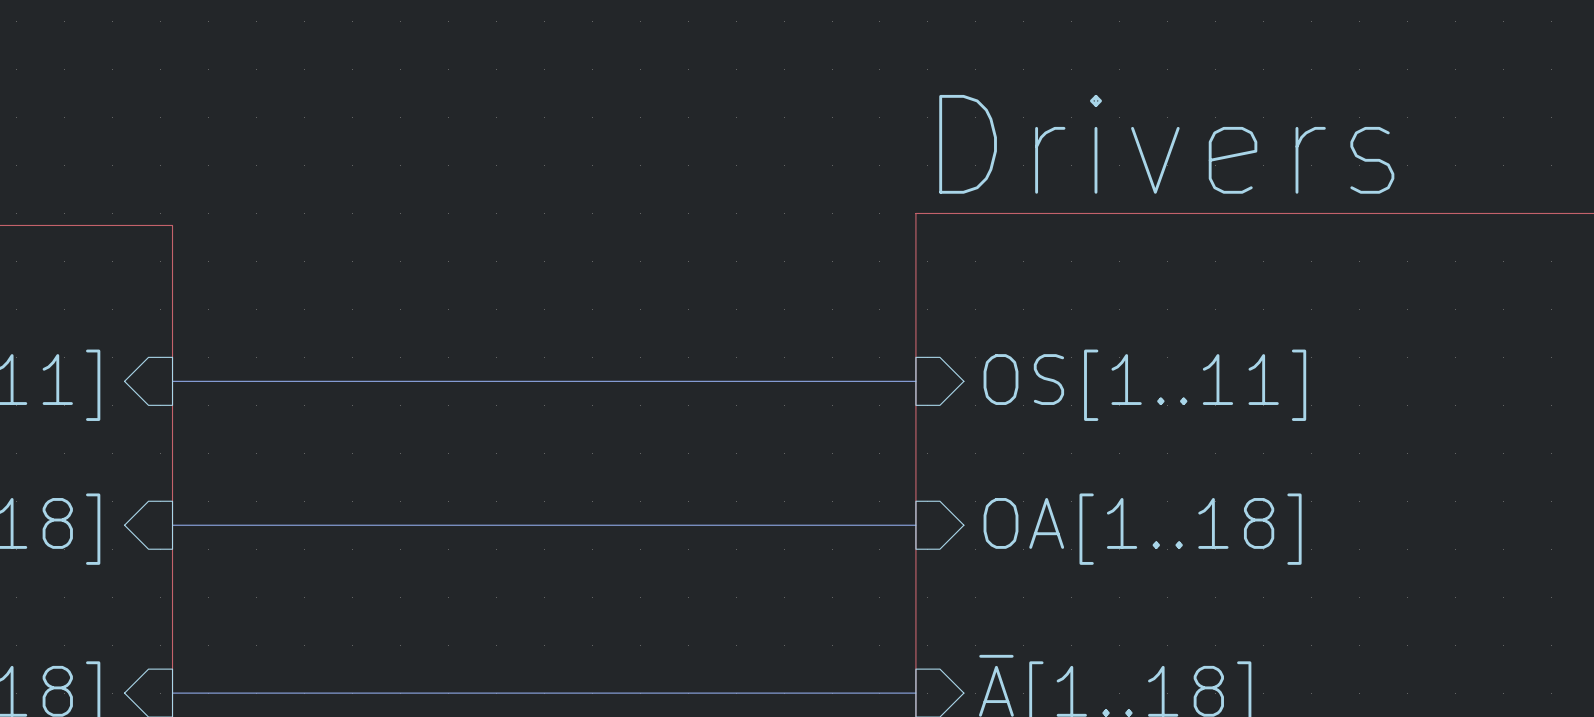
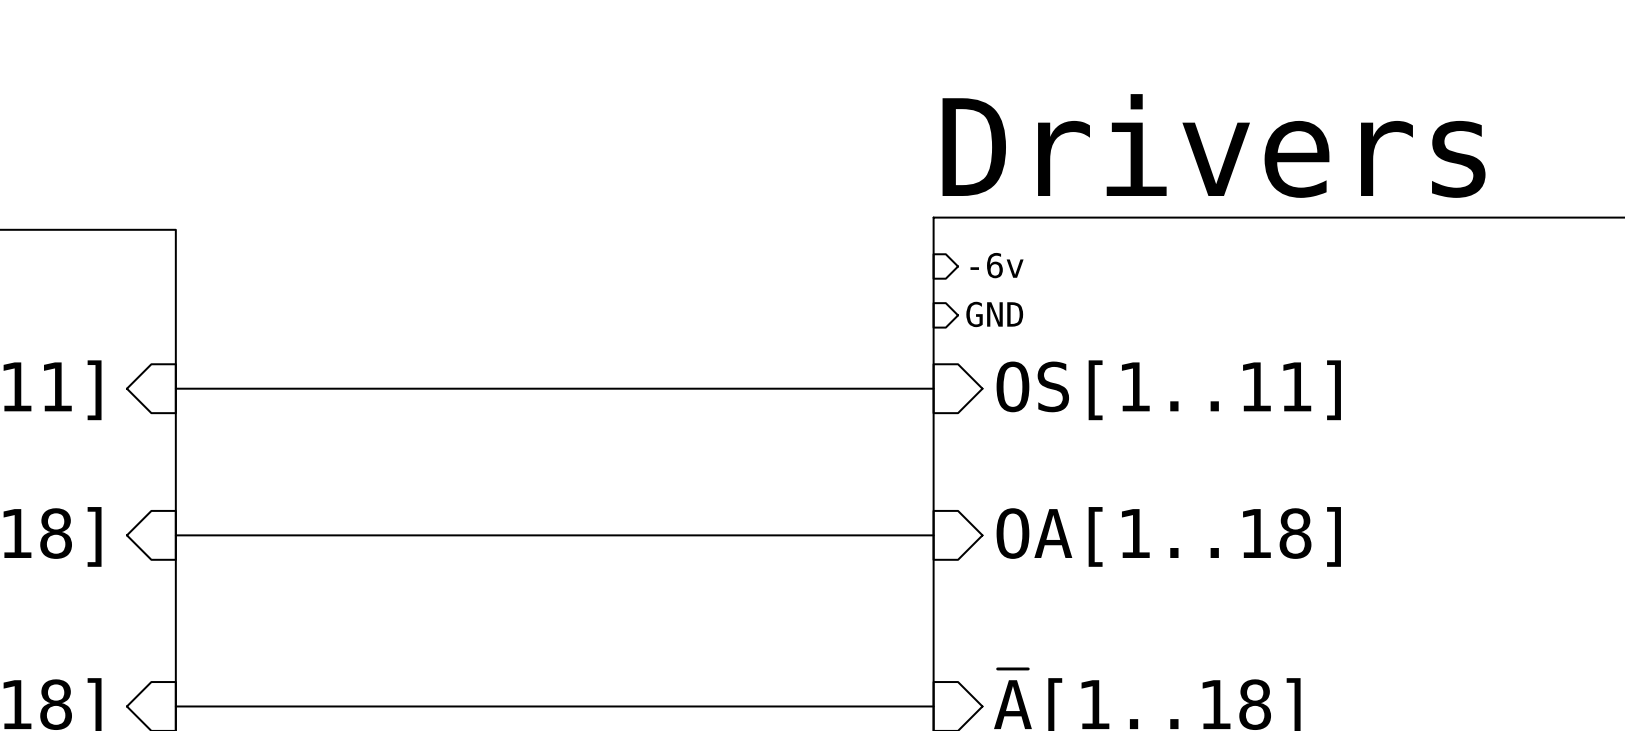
sheet pin: none -> -6v (997, 265)
sheet pin: none -> GND (994, 314)

